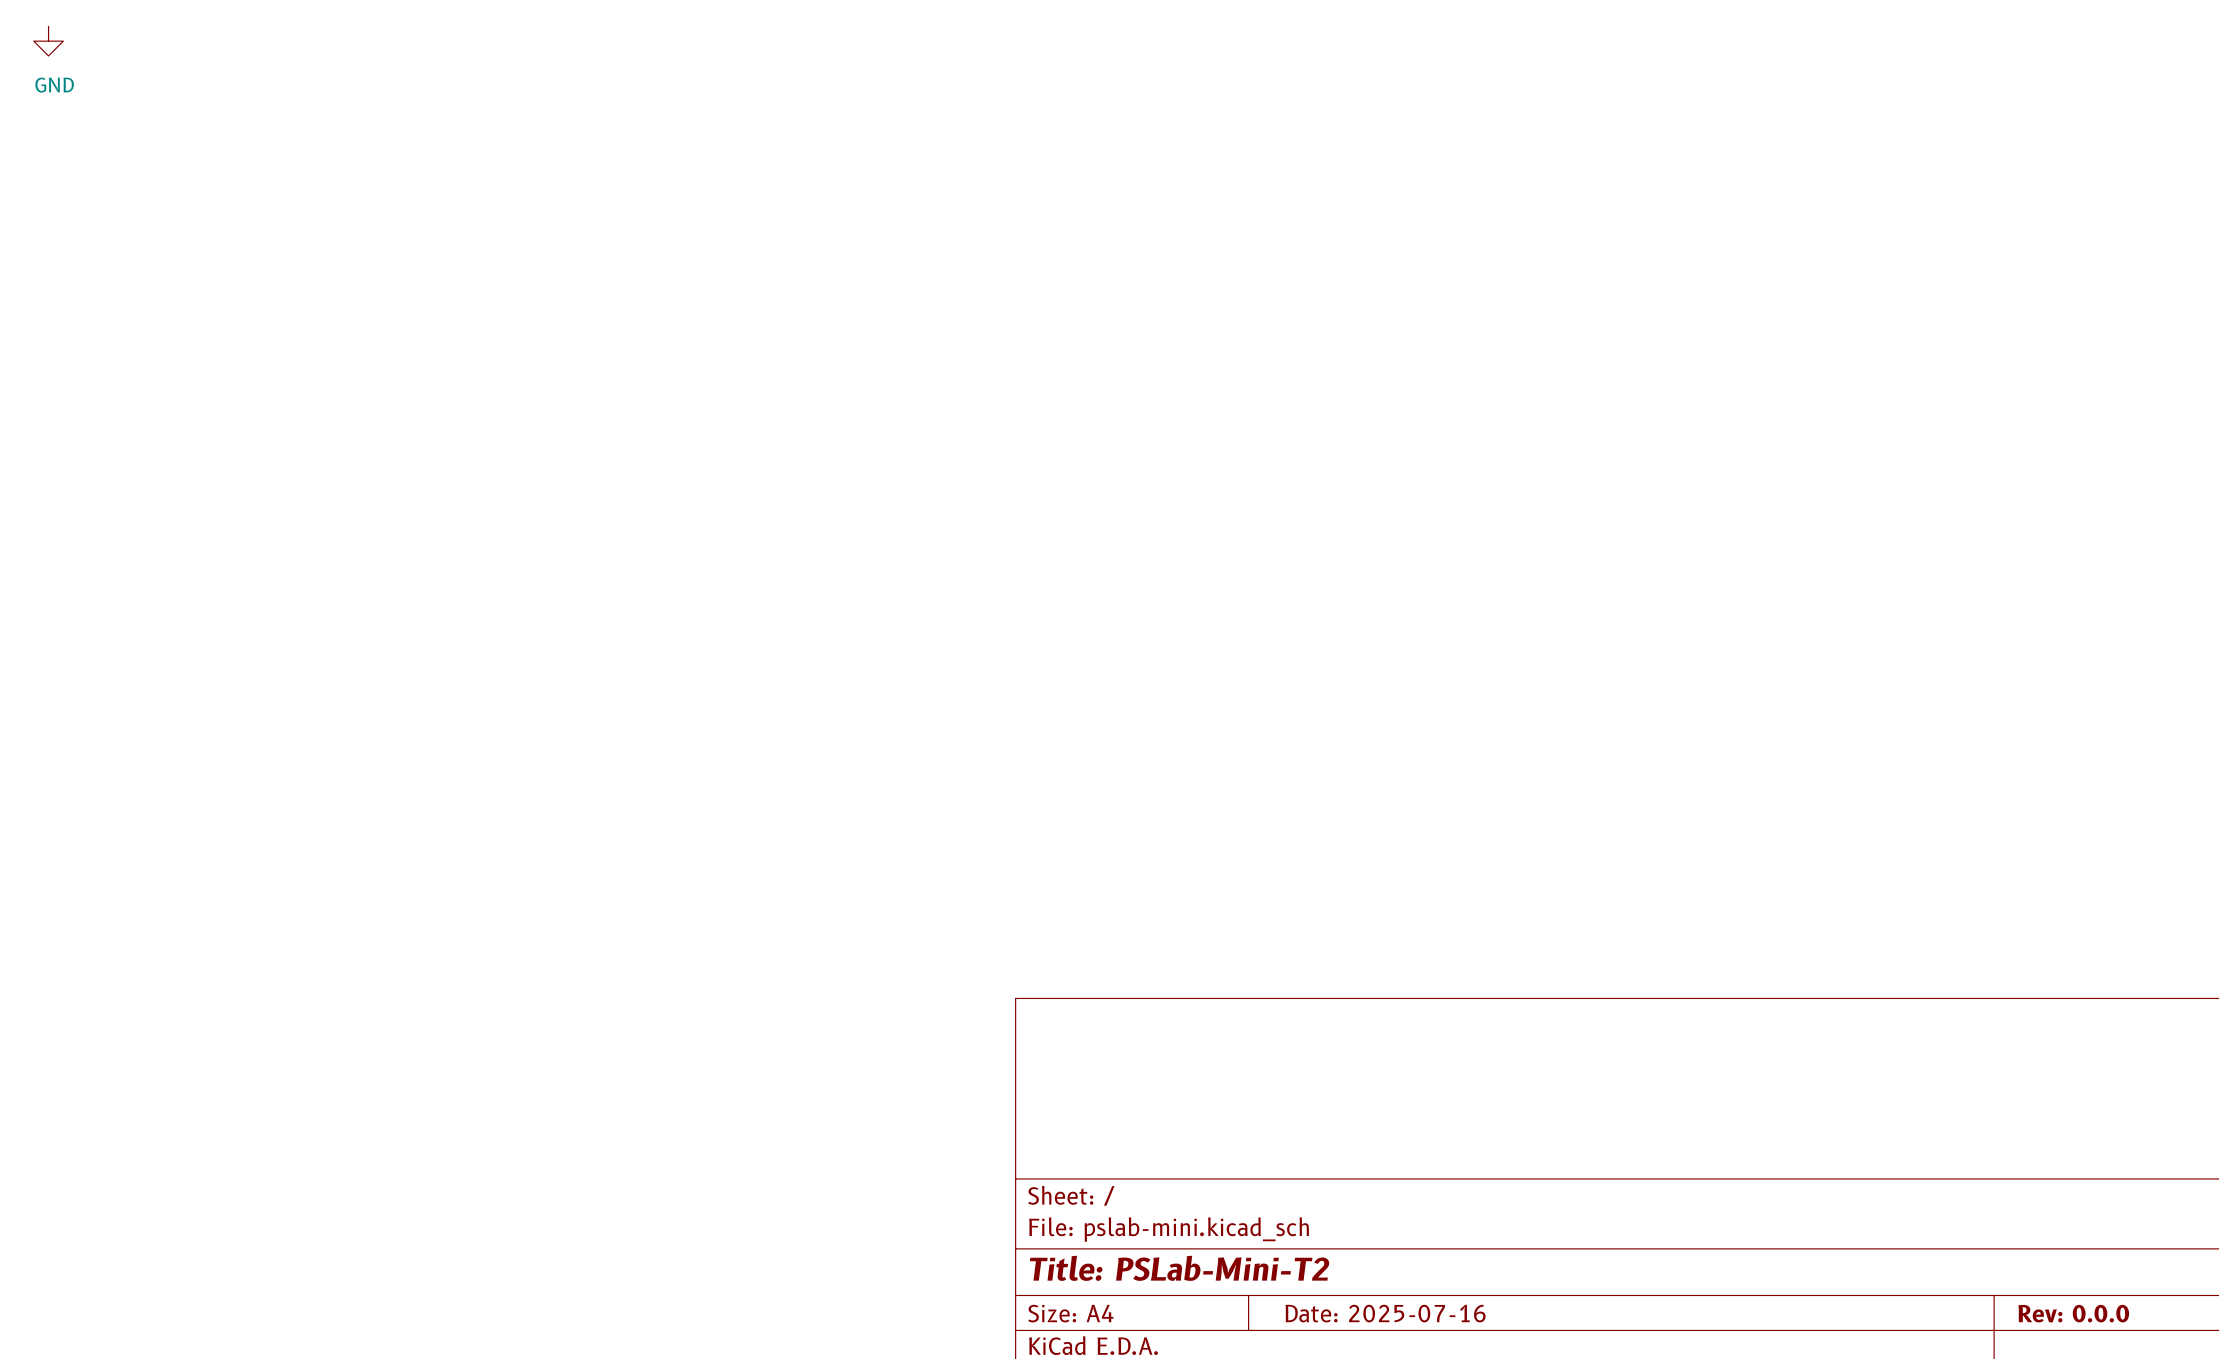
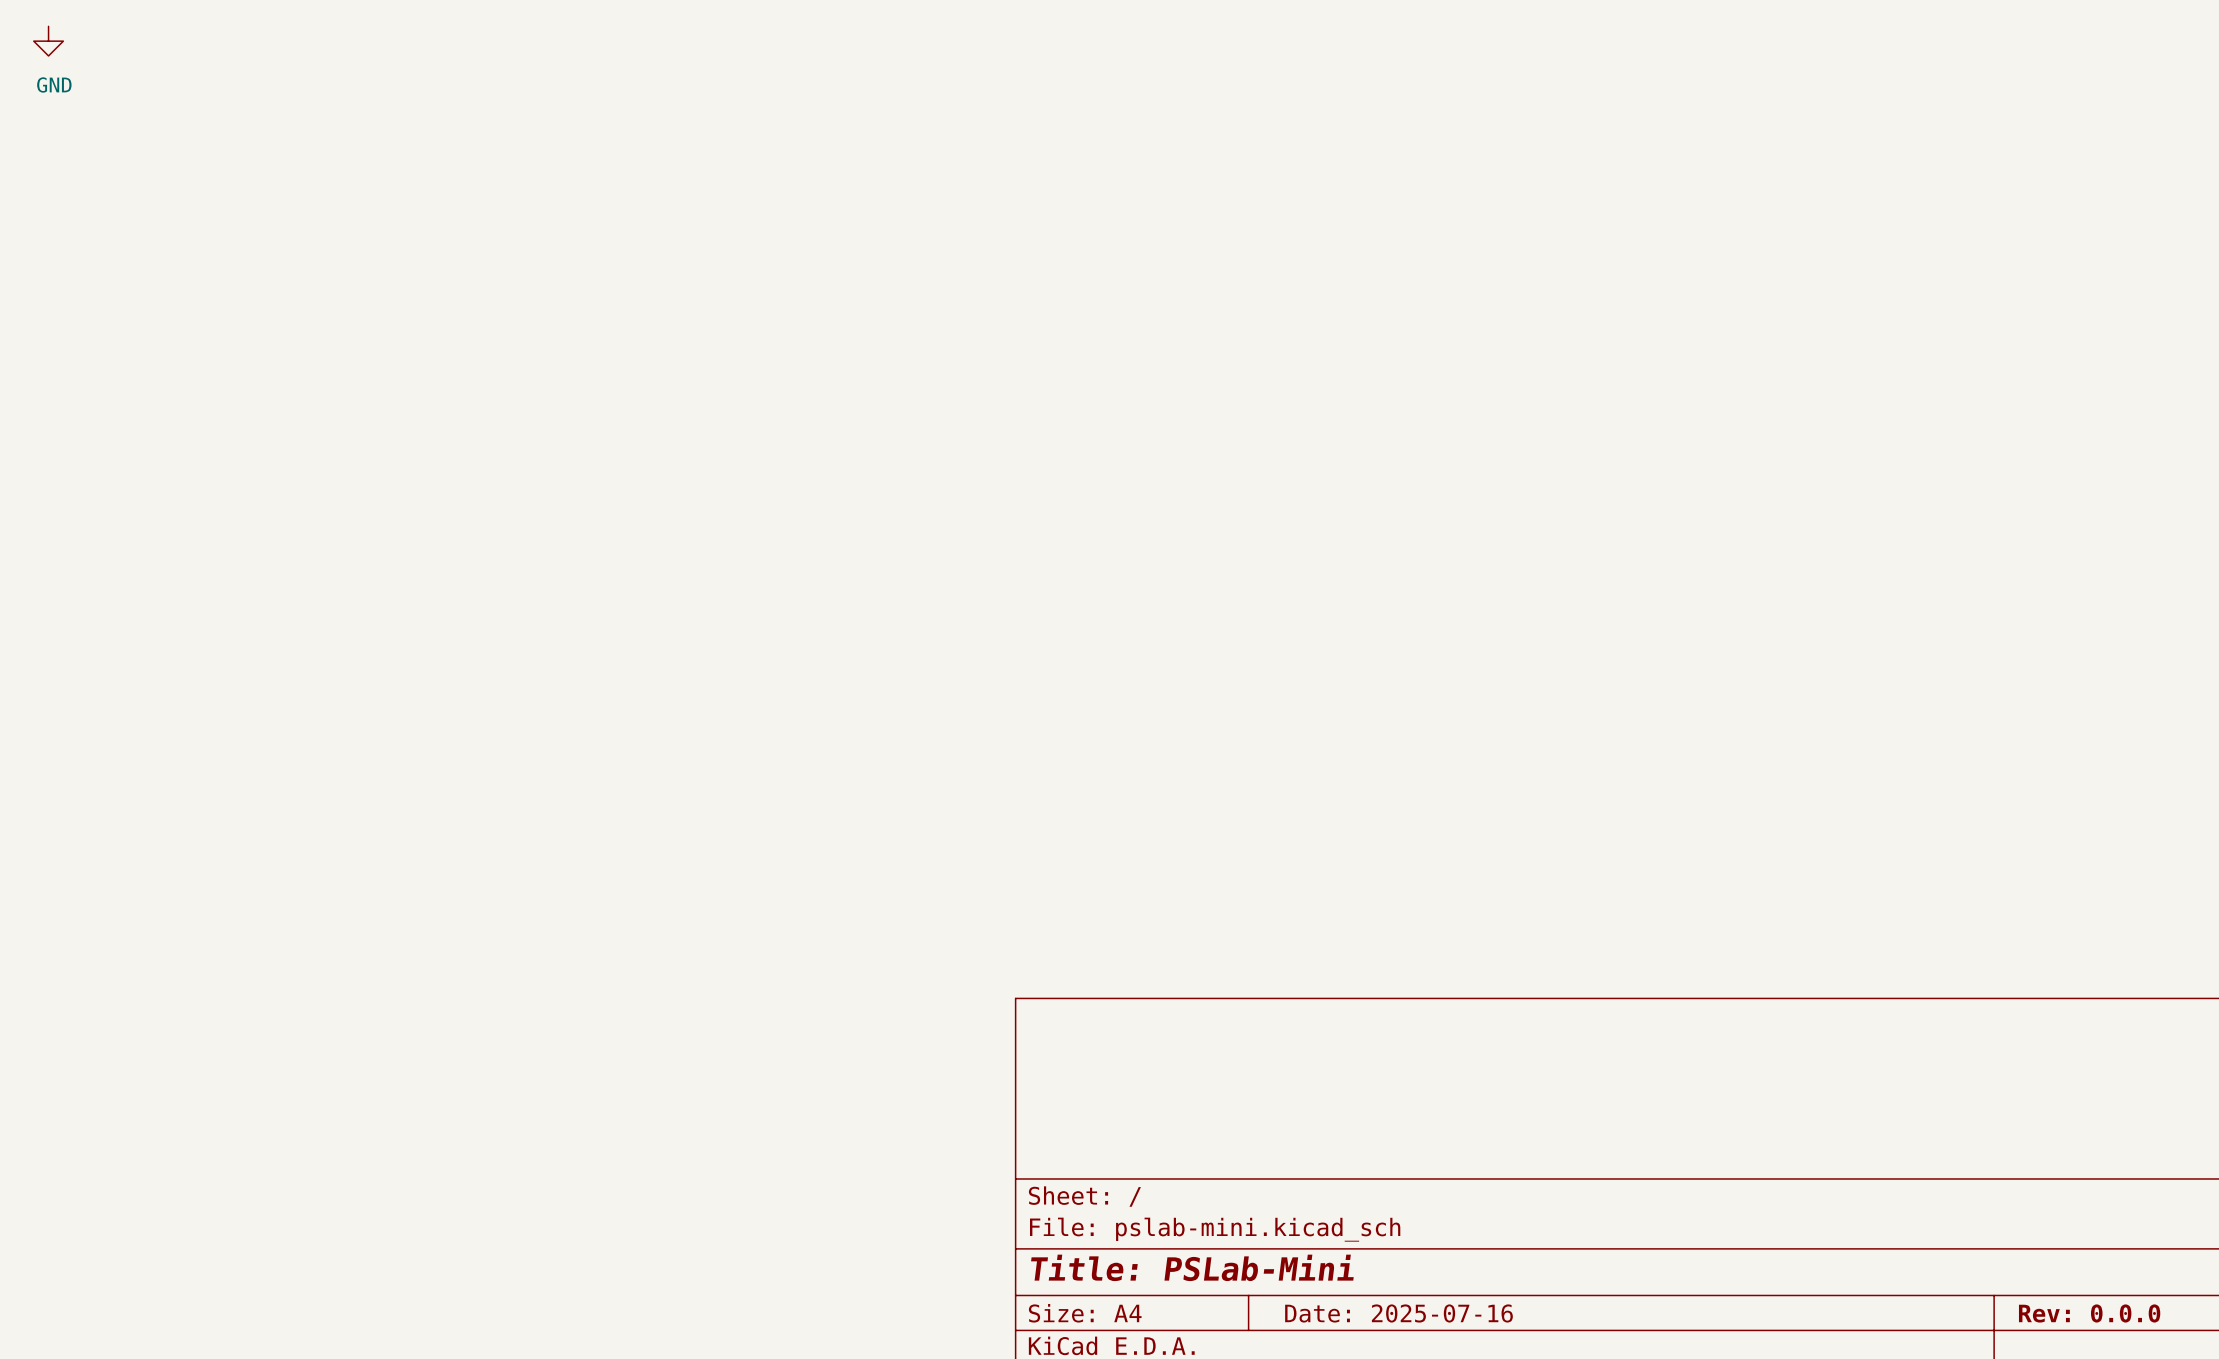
title block: Title: PSLab-Mini-T2 (1179, 1268) -> Title: PSLab-Mini (1192, 1267)

